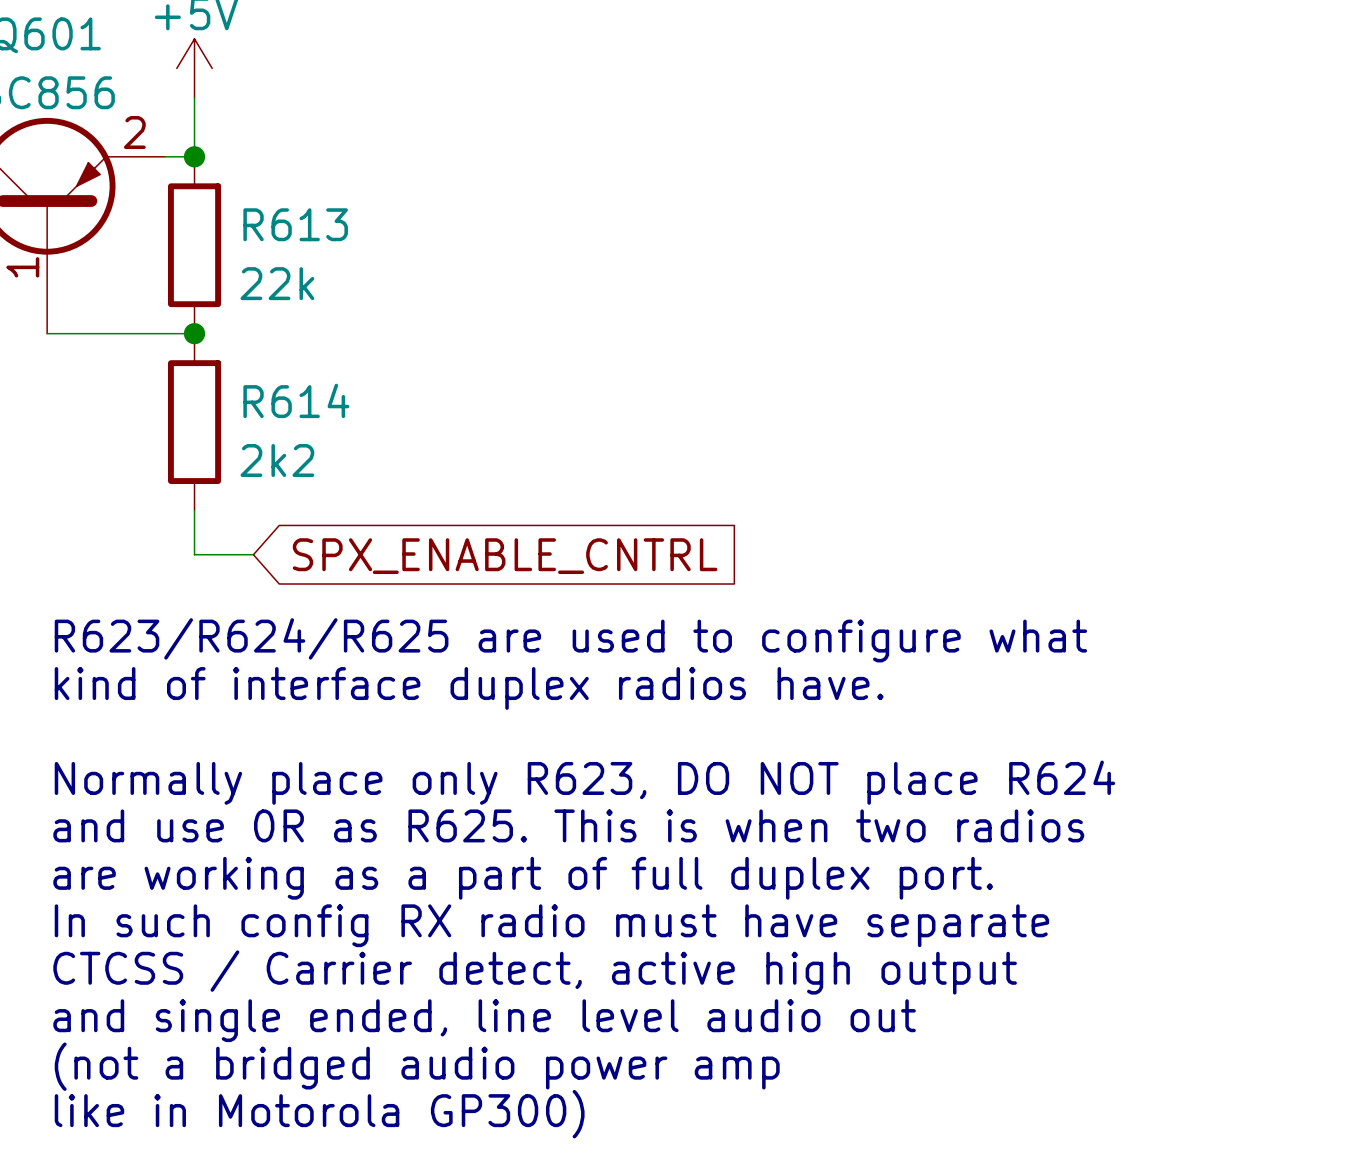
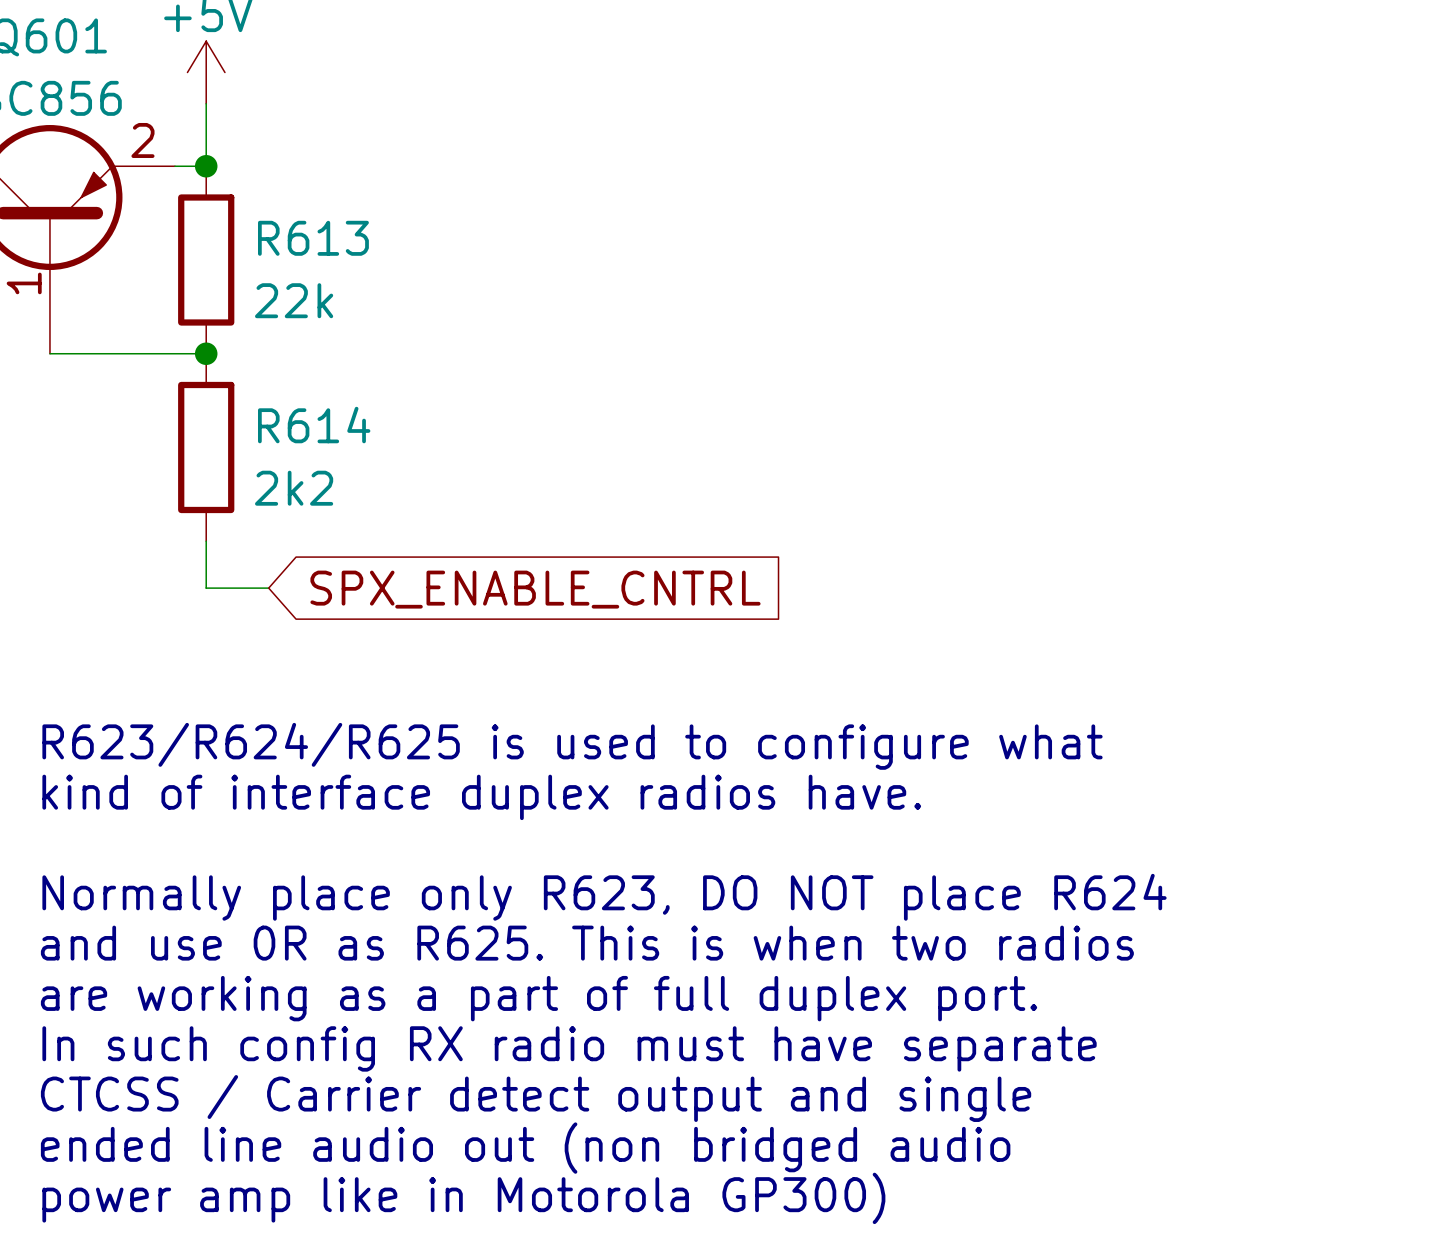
text: R623/R624/R625 are used to configure what (570, 640) -> none
text position: kind of interface duplex radios have. (469, 688) -> kind of interface duplex radios have. (481, 797)
text: none -> R623/R624/R625 is used to configure what (572, 746)
text position: Normally place only R623, DO NOT place R624 (584, 782) -> Normally place only R623, DO NOT place R624 (604, 897)
text position: and use 0R as R625. This is when two radios (568, 825) -> and use 0R as R625. This is when two radios (587, 943)
text position: are working as a part of full duplex port. (523, 878) -> are working as a part of full duplex port. (539, 998)
text position: In such config RX radio must have separate (551, 925) -> In such config RX radio must have separate (569, 1048)
text: CTCSS / Carrier detect, active high output (535, 972) -> none
text: and single ended, line level audio out (484, 1020) -> none
text: none -> CTCSS / Carrier detect output and single (536, 1098)
text: (not a bridged audio power amp (417, 1066) -> none
text: none -> ended line audio out (non bridged audio (525, 1148)
text: like in Motorola GP300) (319, 1114) -> power amp like in Motorola GP300) (463, 1198)

